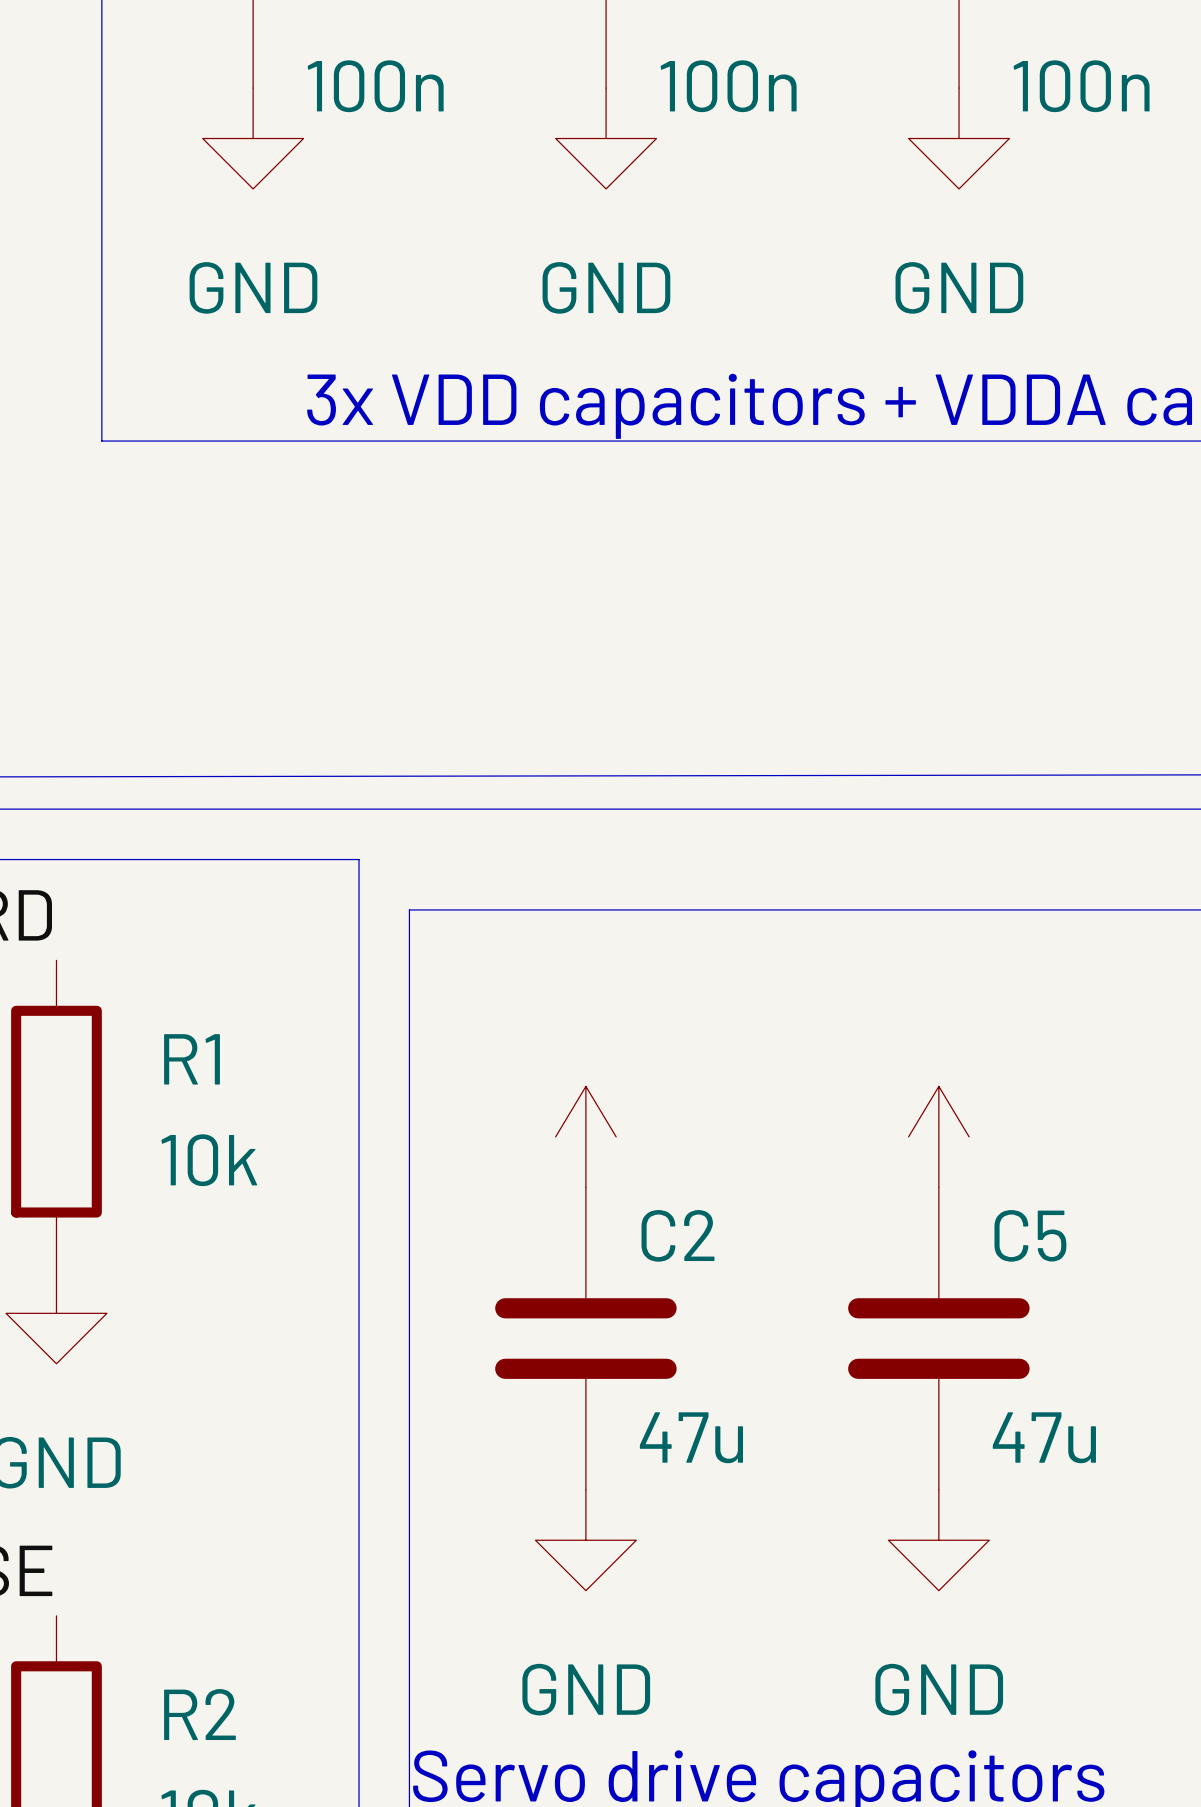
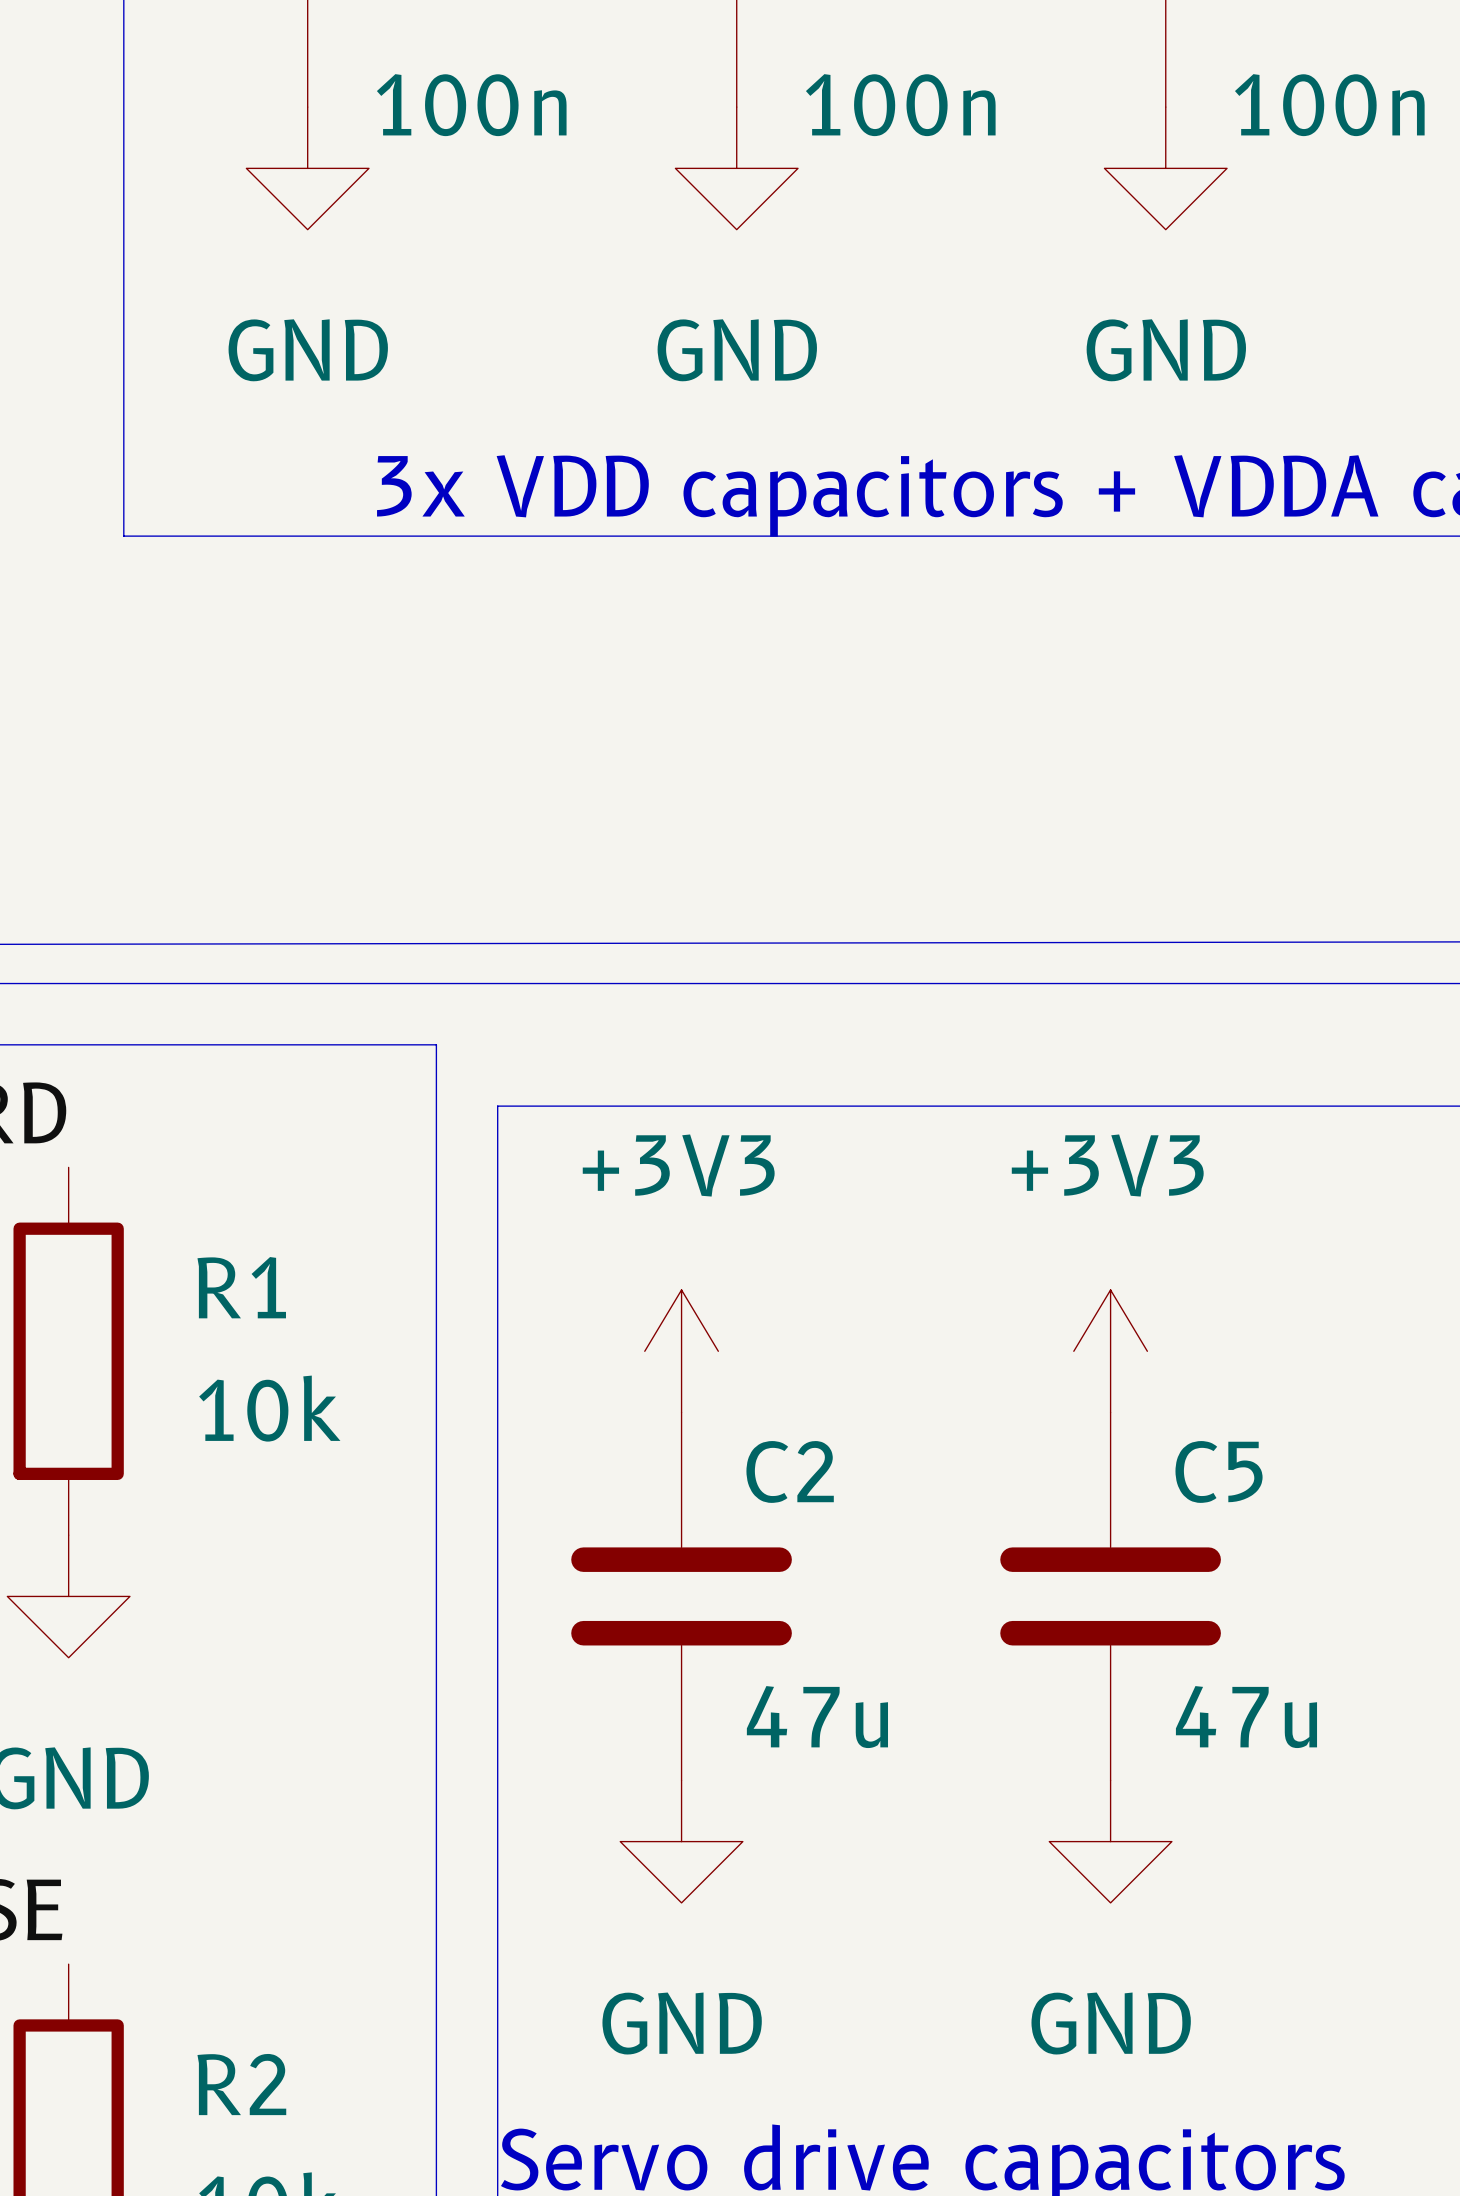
power symbol text: none -> +3V3 (678, 1165)
power symbol text: none -> +3V3 (1107, 1165)
power symbol position: (585, 1136) -> +3V3 (681, 1351)
power symbol position: (938, 1136) -> +3V3 (1110, 1351)
C2 position: (585, 1338) -> (681, 1596)
C5 position: (938, 1338) -> (1110, 1596)
power symbol position: GND (585, 1540) -> GND (681, 1841)
power symbol position: GND (938, 1540) -> GND (1110, 1841)

